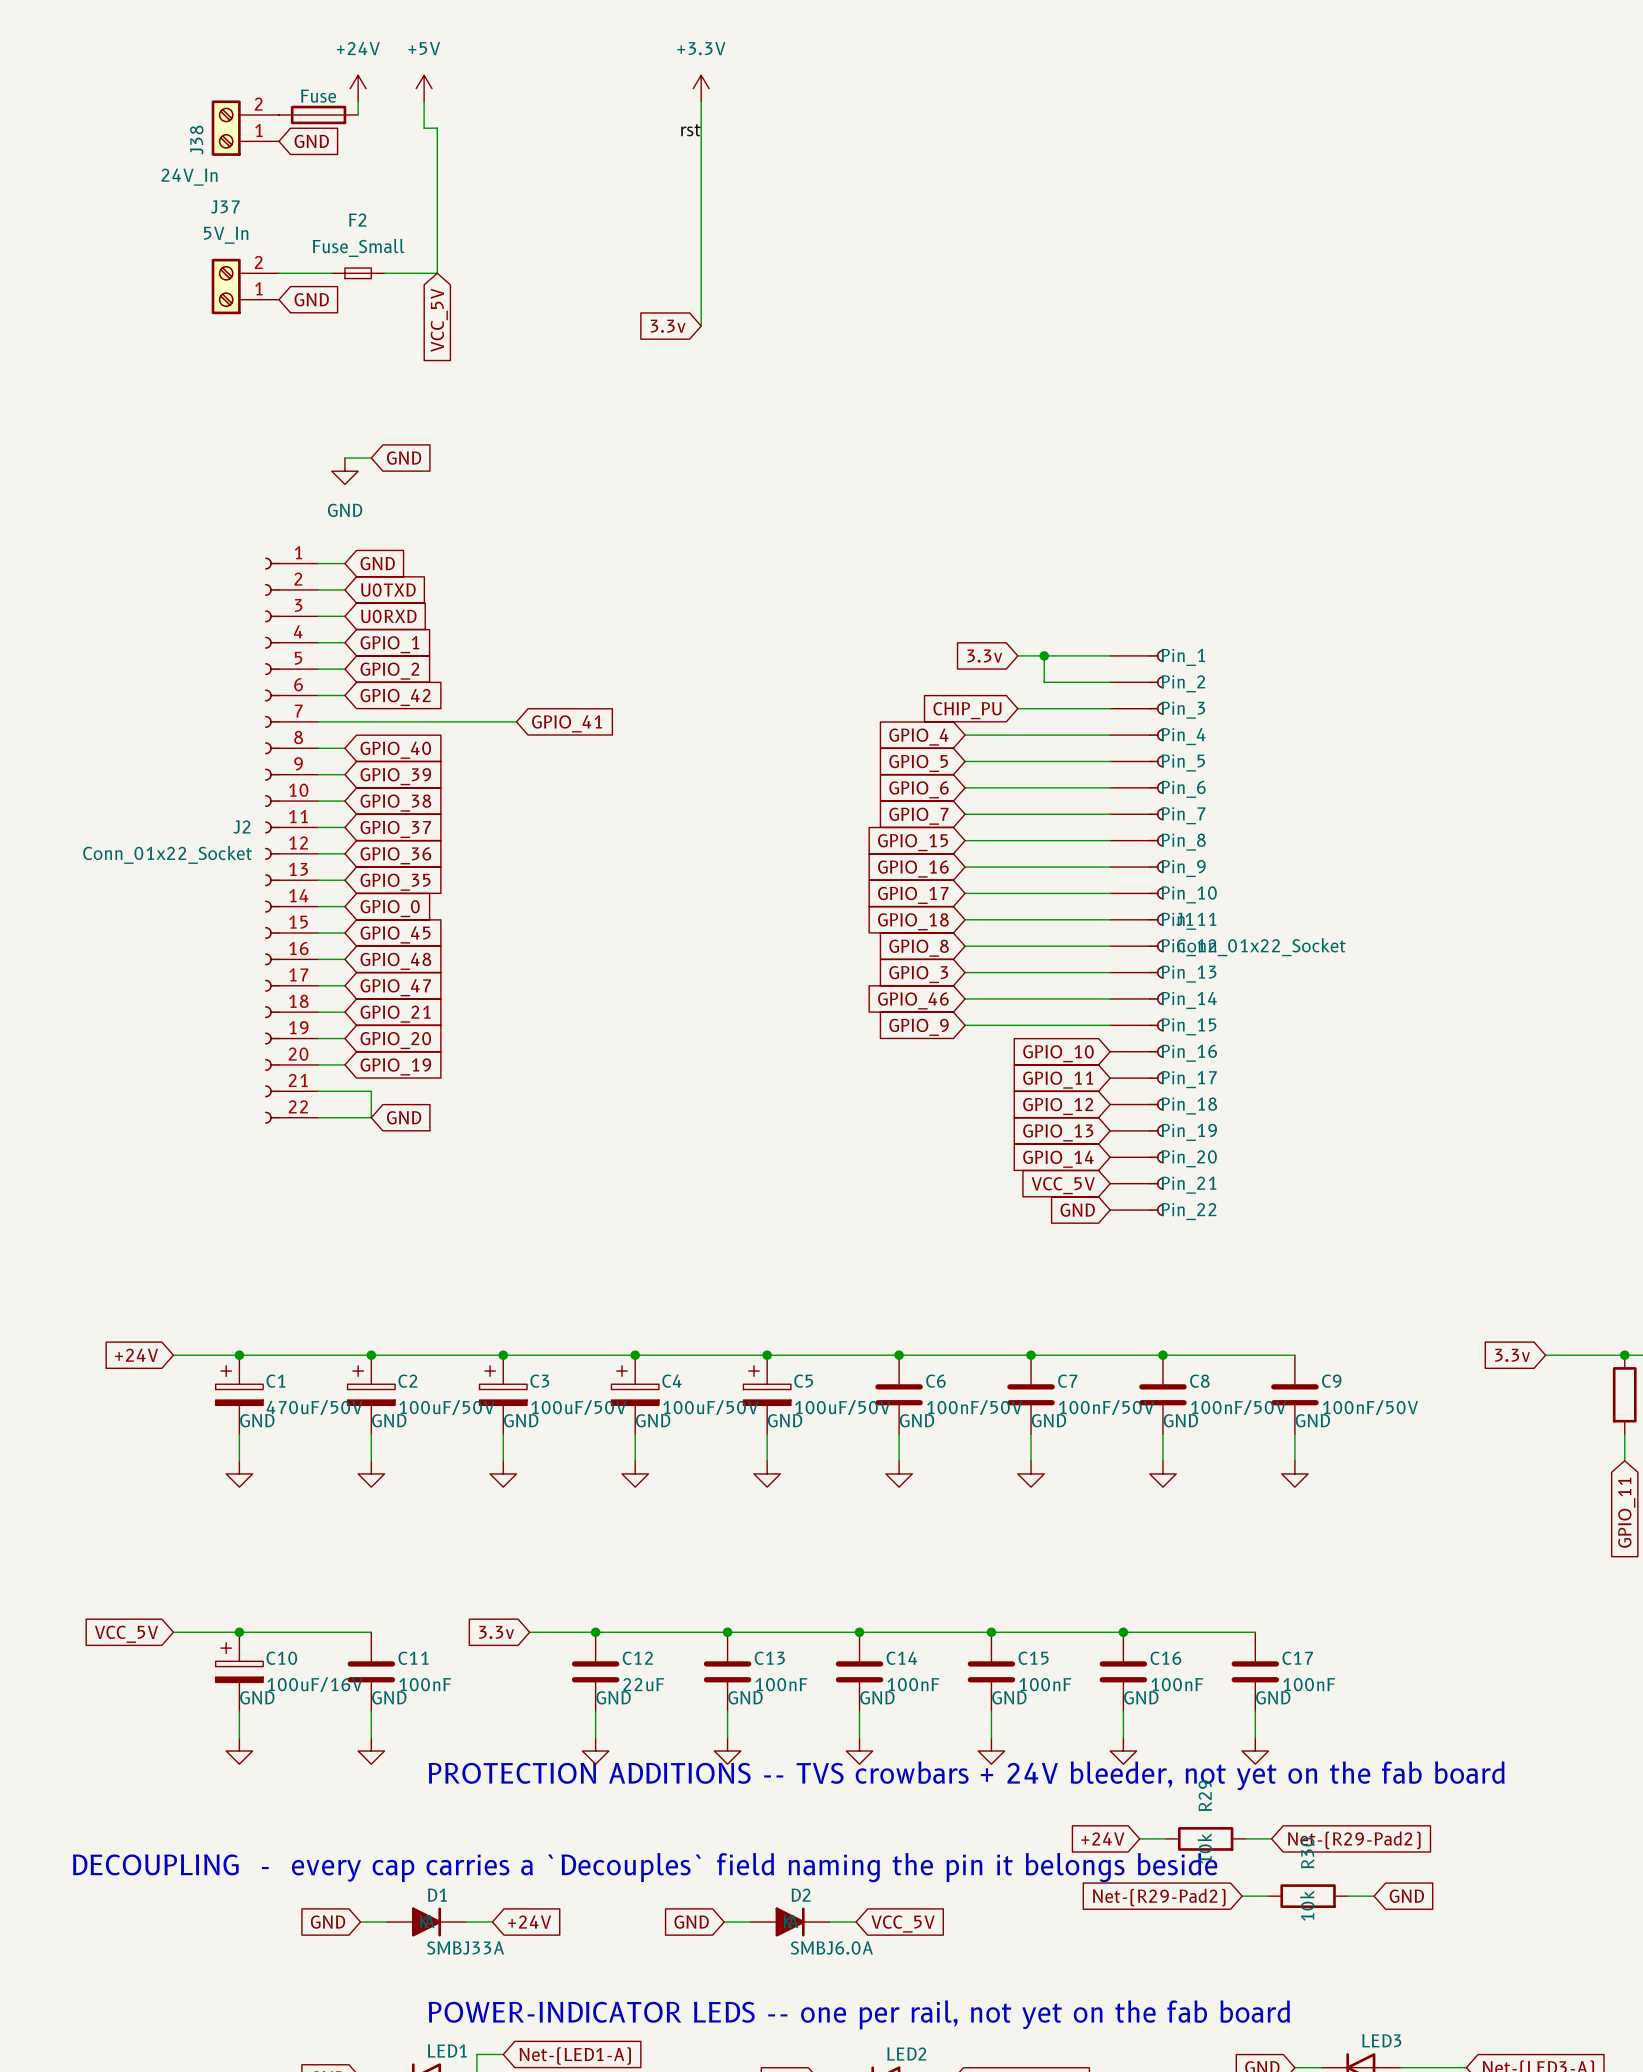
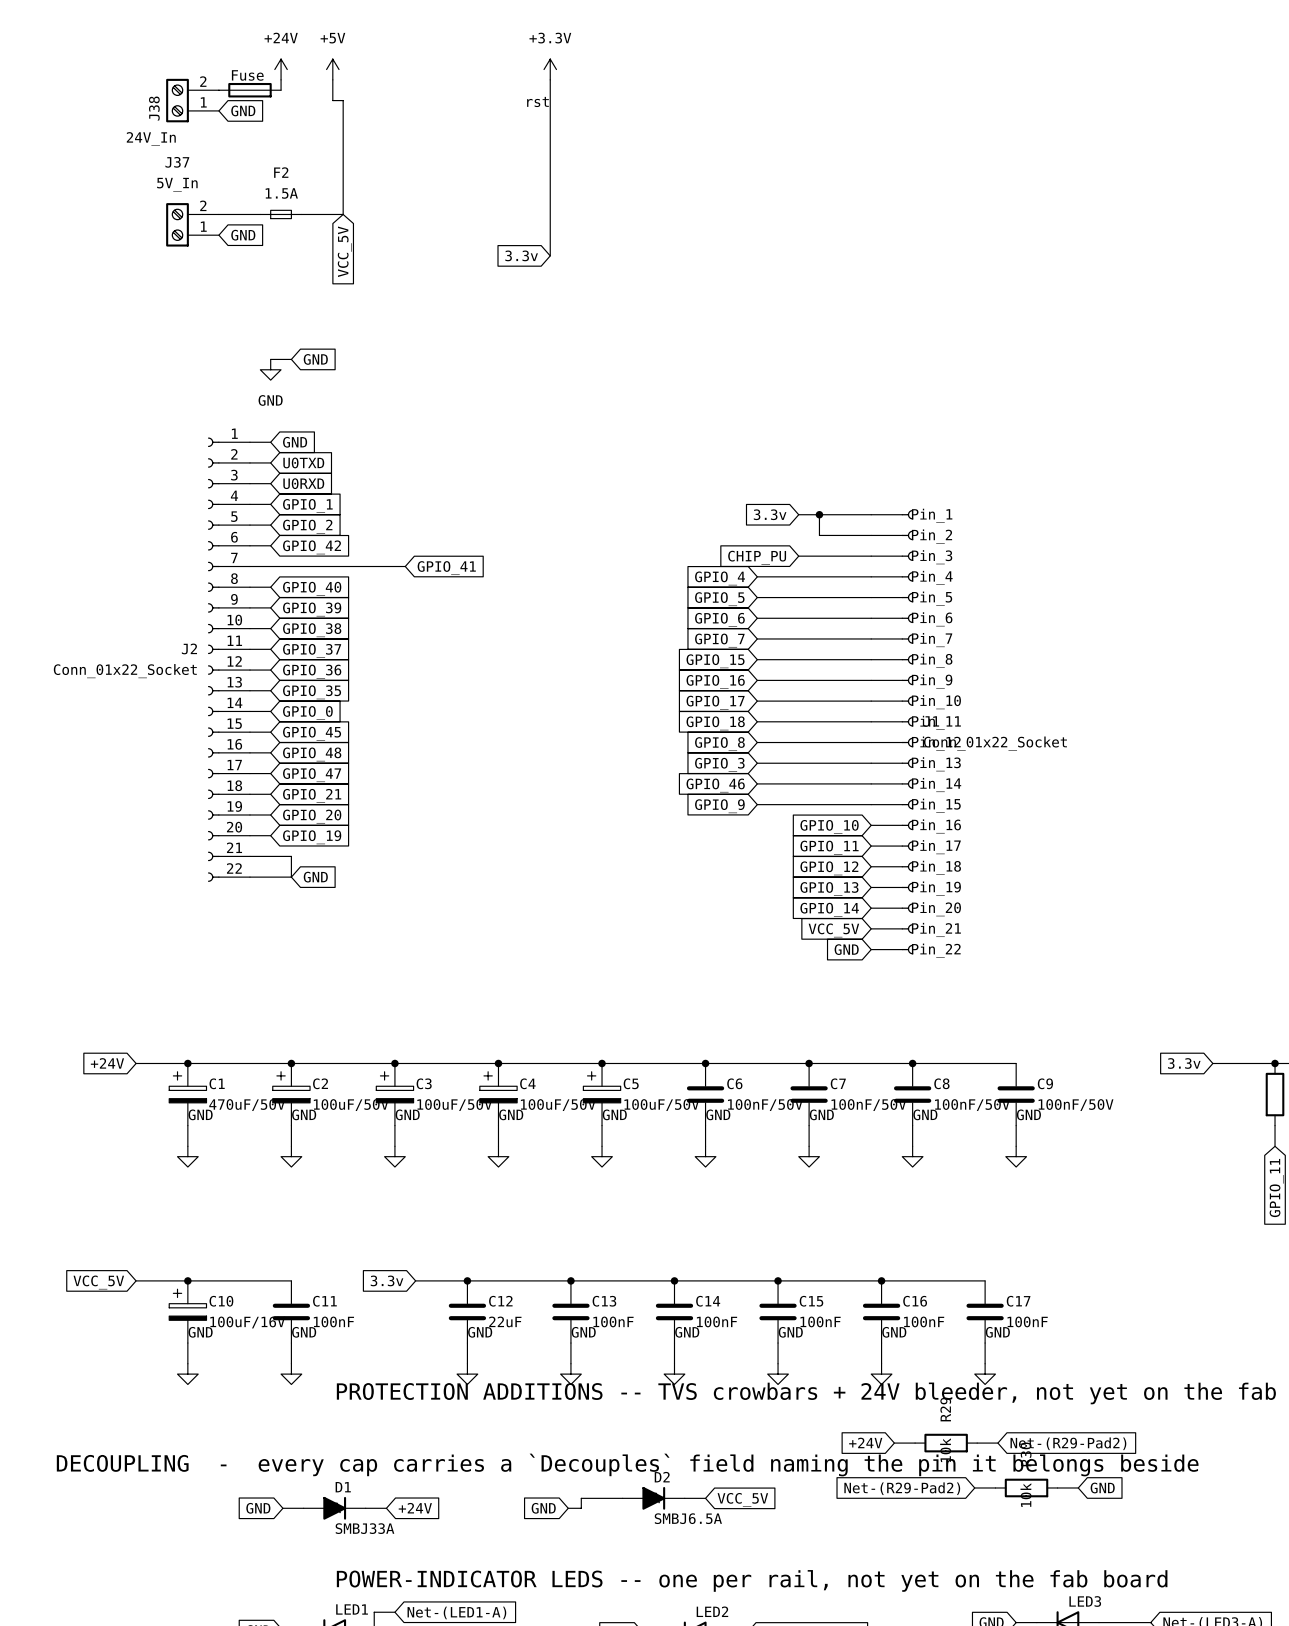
F2 value: Fuse_Small (358, 247) -> 1.5A (281, 193)
wire: (740, 1922) (750, 1922) -> (581, 1508) (581, 1498) (622, 1498)
D2 position: (790, 1922) -> (653, 1498)
wire: (829, 1922) (856, 1922) -> (684, 1498) (705, 1498)
global label position: VCC_5V (903, 1924) -> VCC_5V (742, 1499)
D2 value: SMBJ6.0A (831, 1947) -> SMBJ6.5A (688, 1518)

